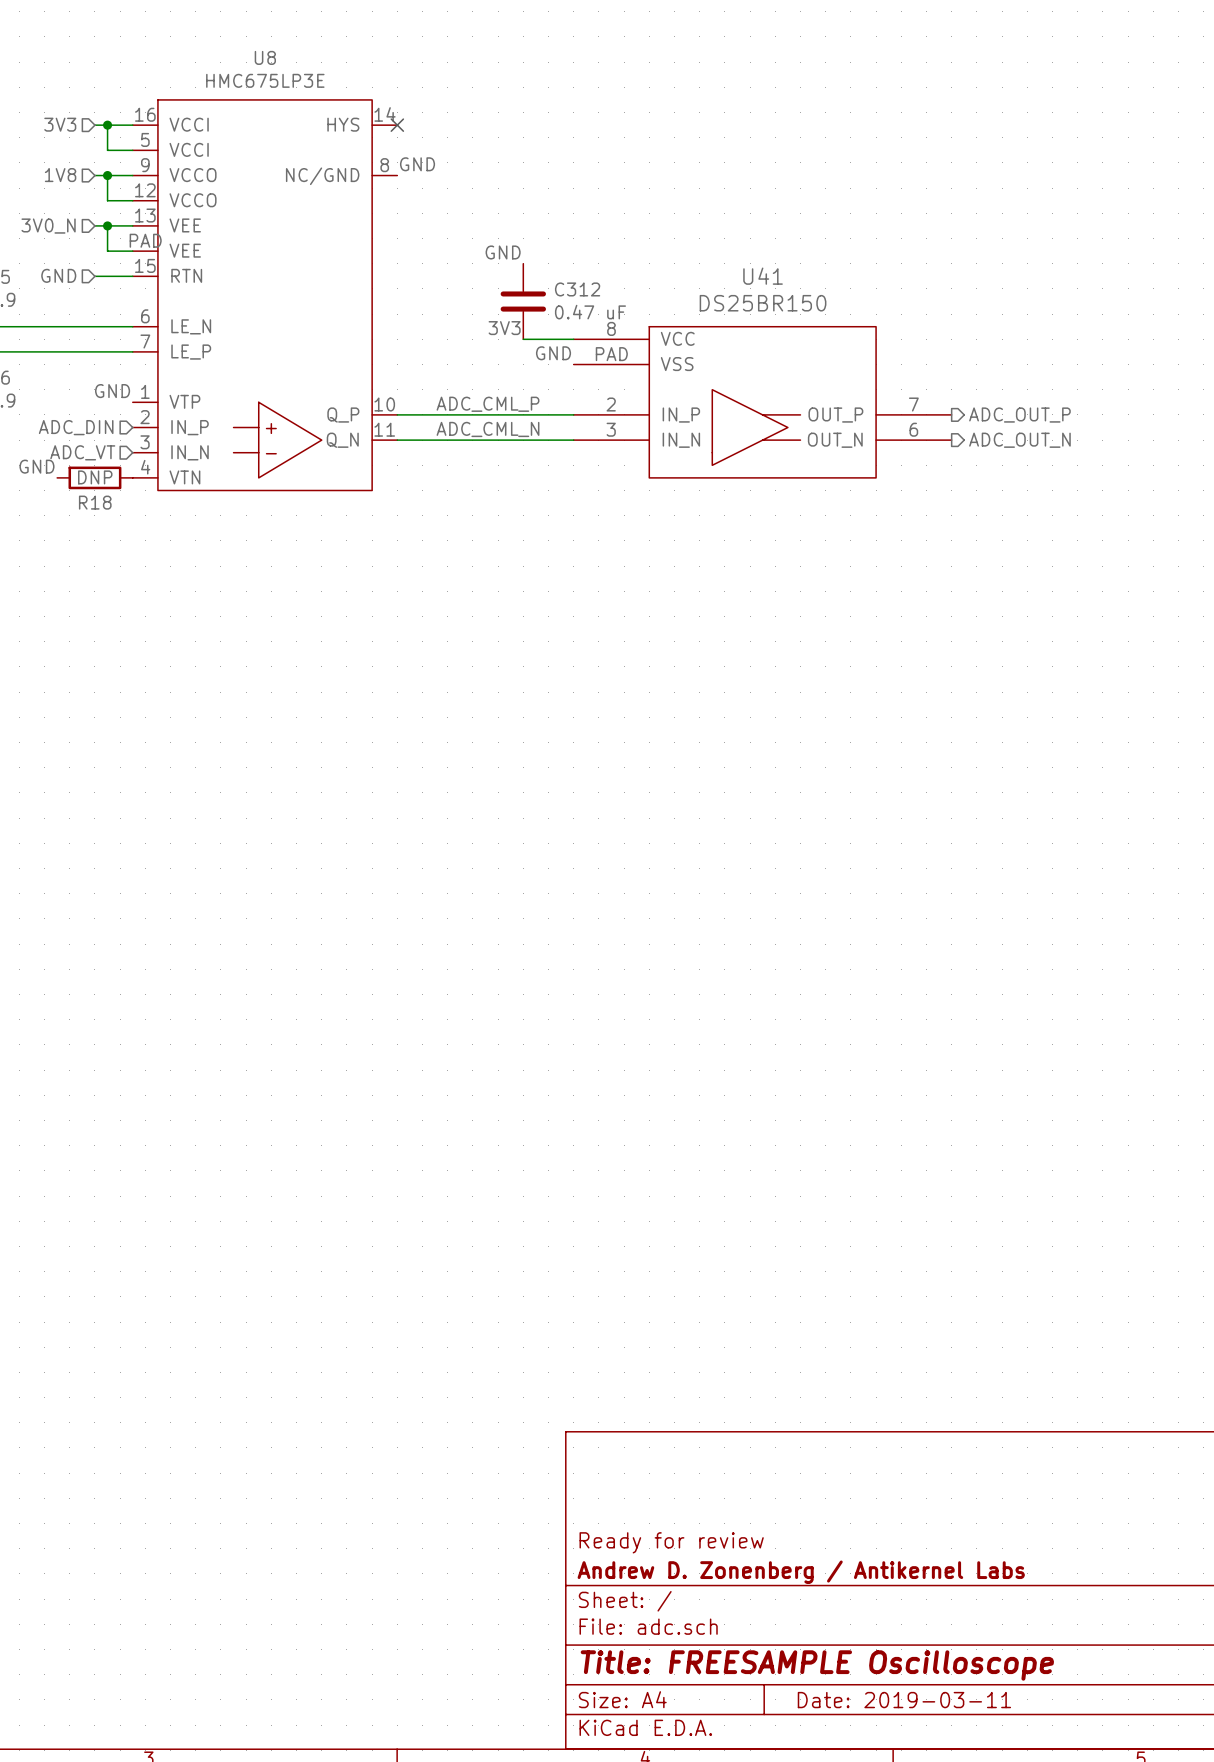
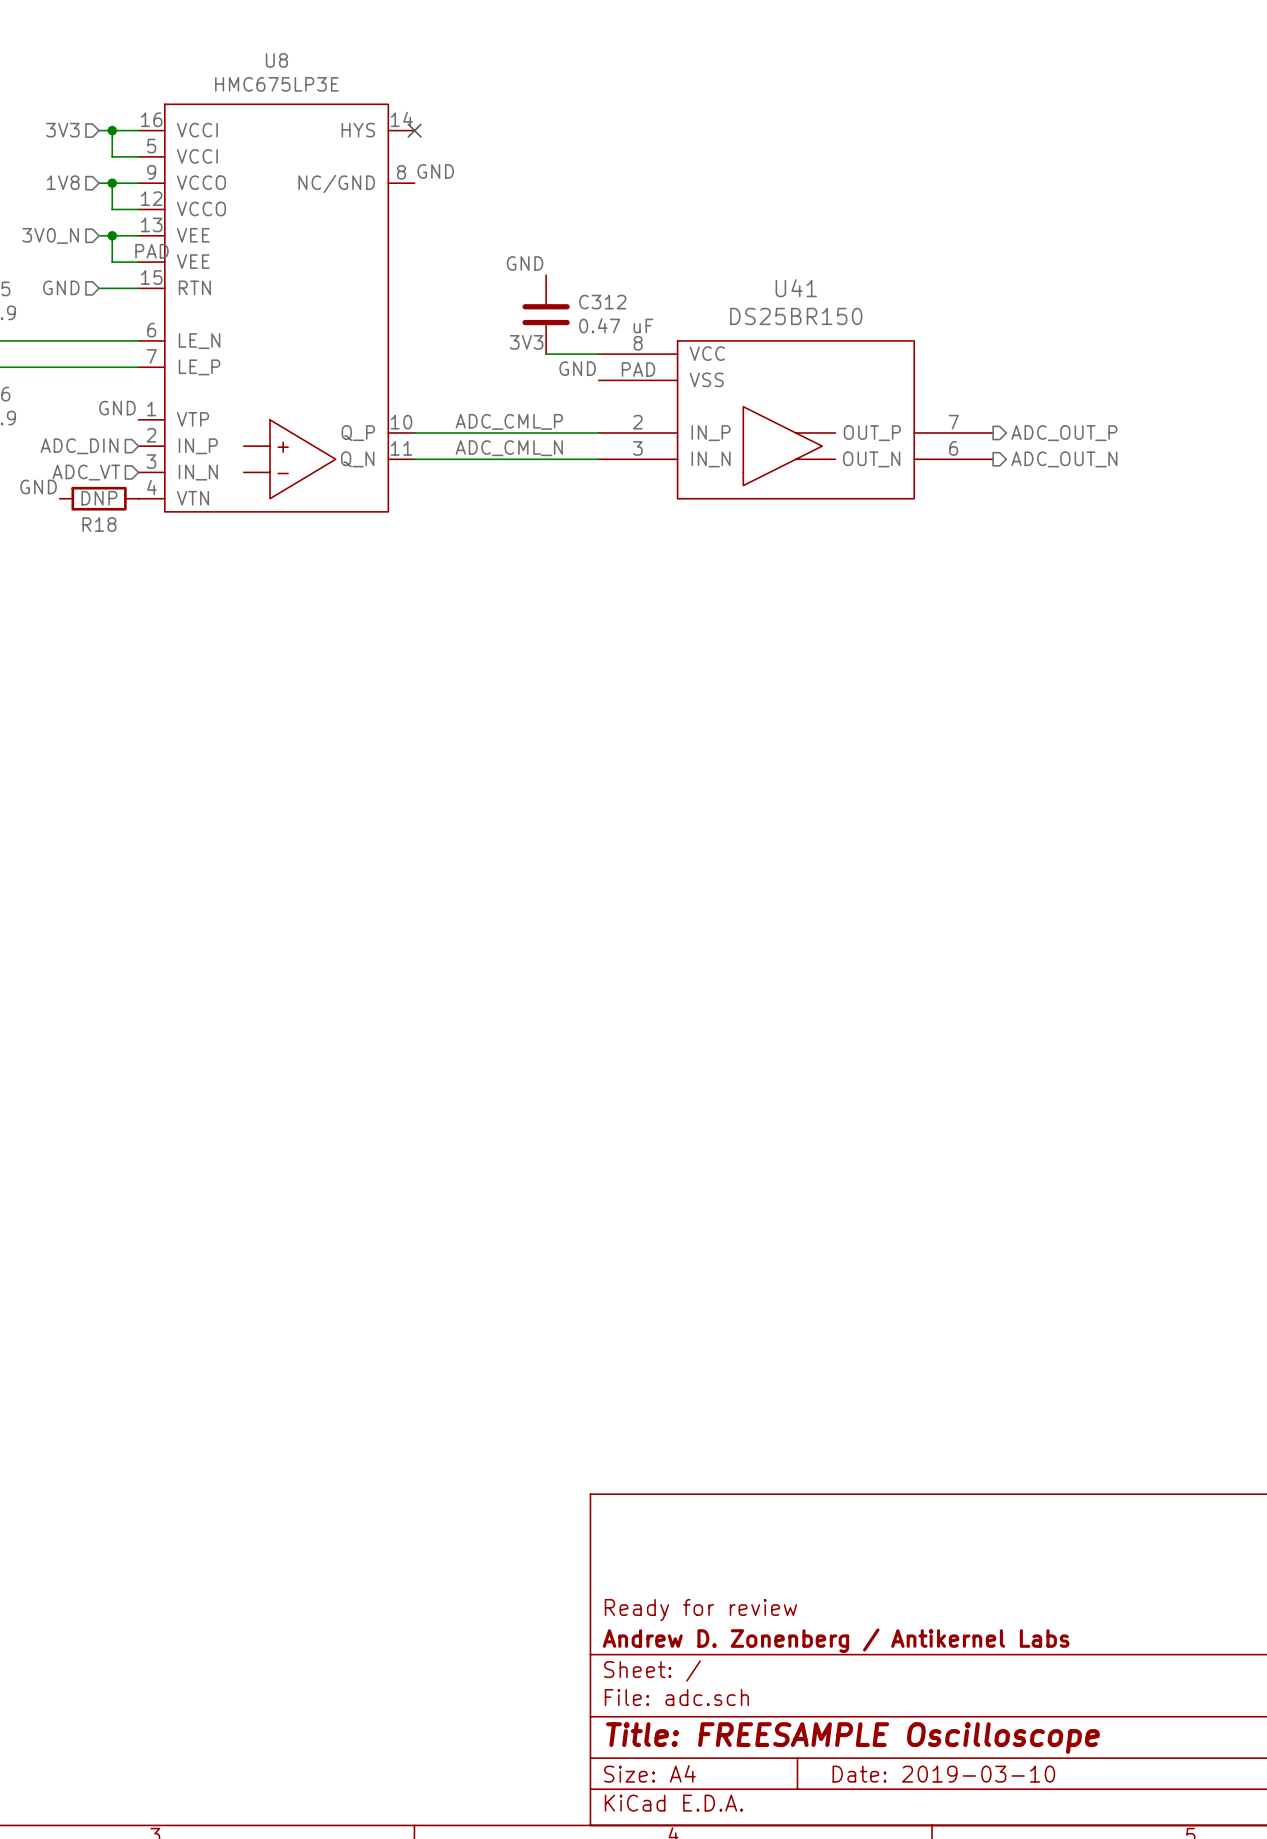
title block: Date: 2019-03-11 (904, 1700) -> Date: 2019-03-10 (943, 1774)

